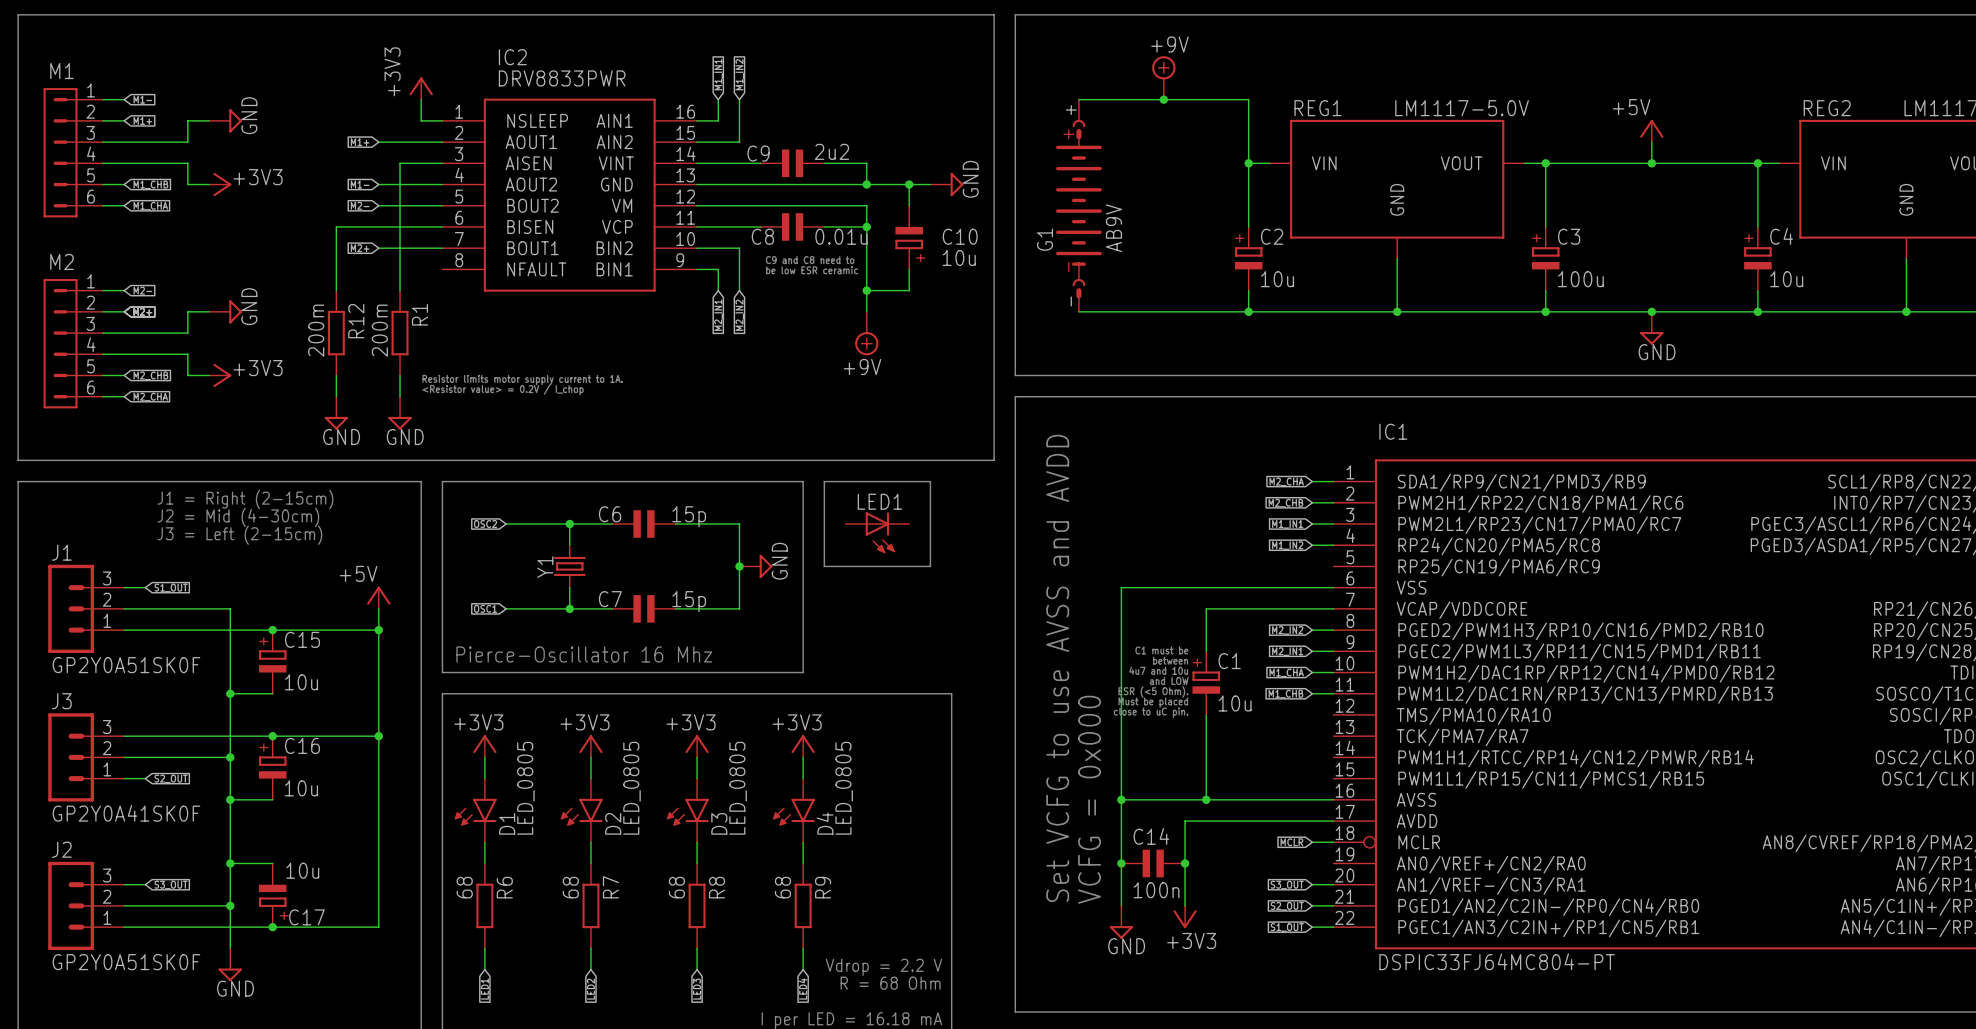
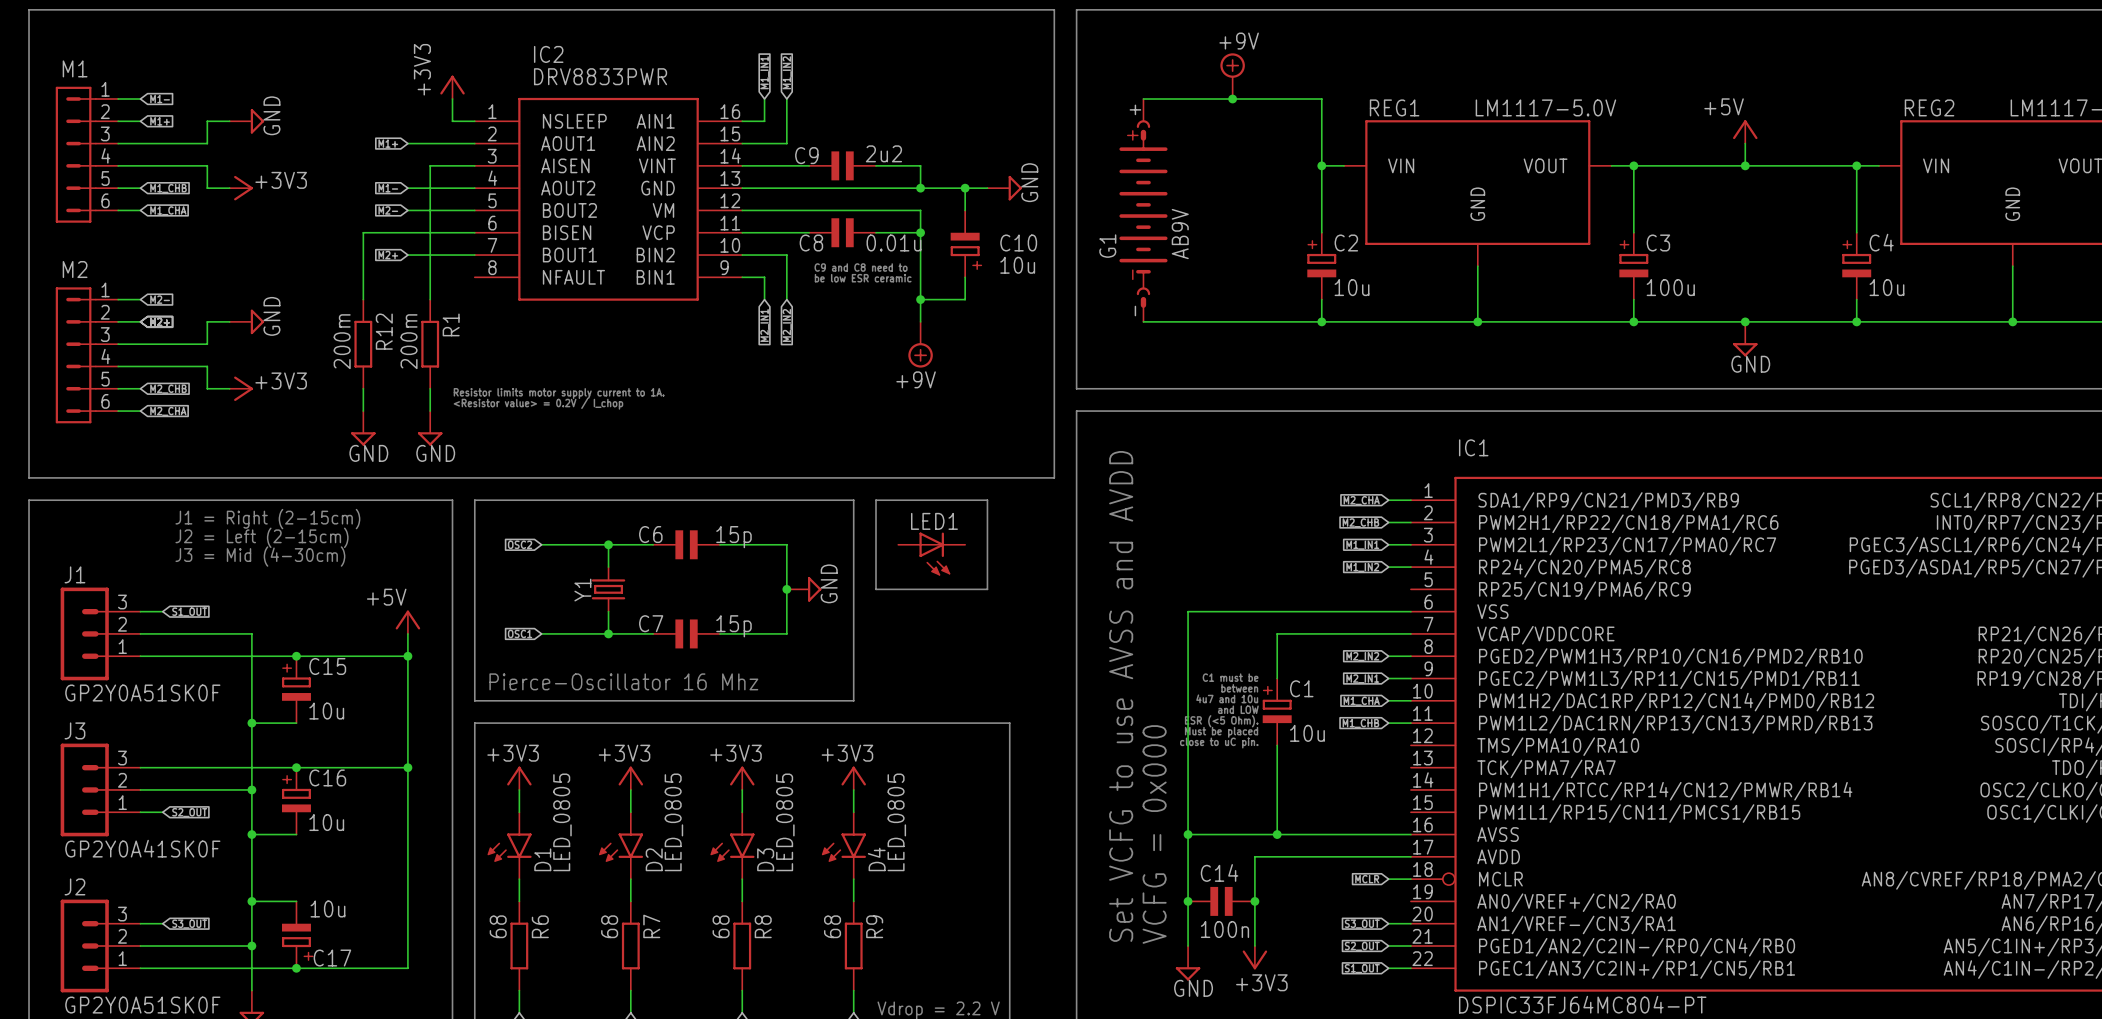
text: J2 = Mid (4-30cm) (238, 517) -> J2 = Left (2-15cm) (262, 537)
text: J3 = Left (2-15cm) (239, 535) -> J3 = Mid (4-30cm) (260, 556)

